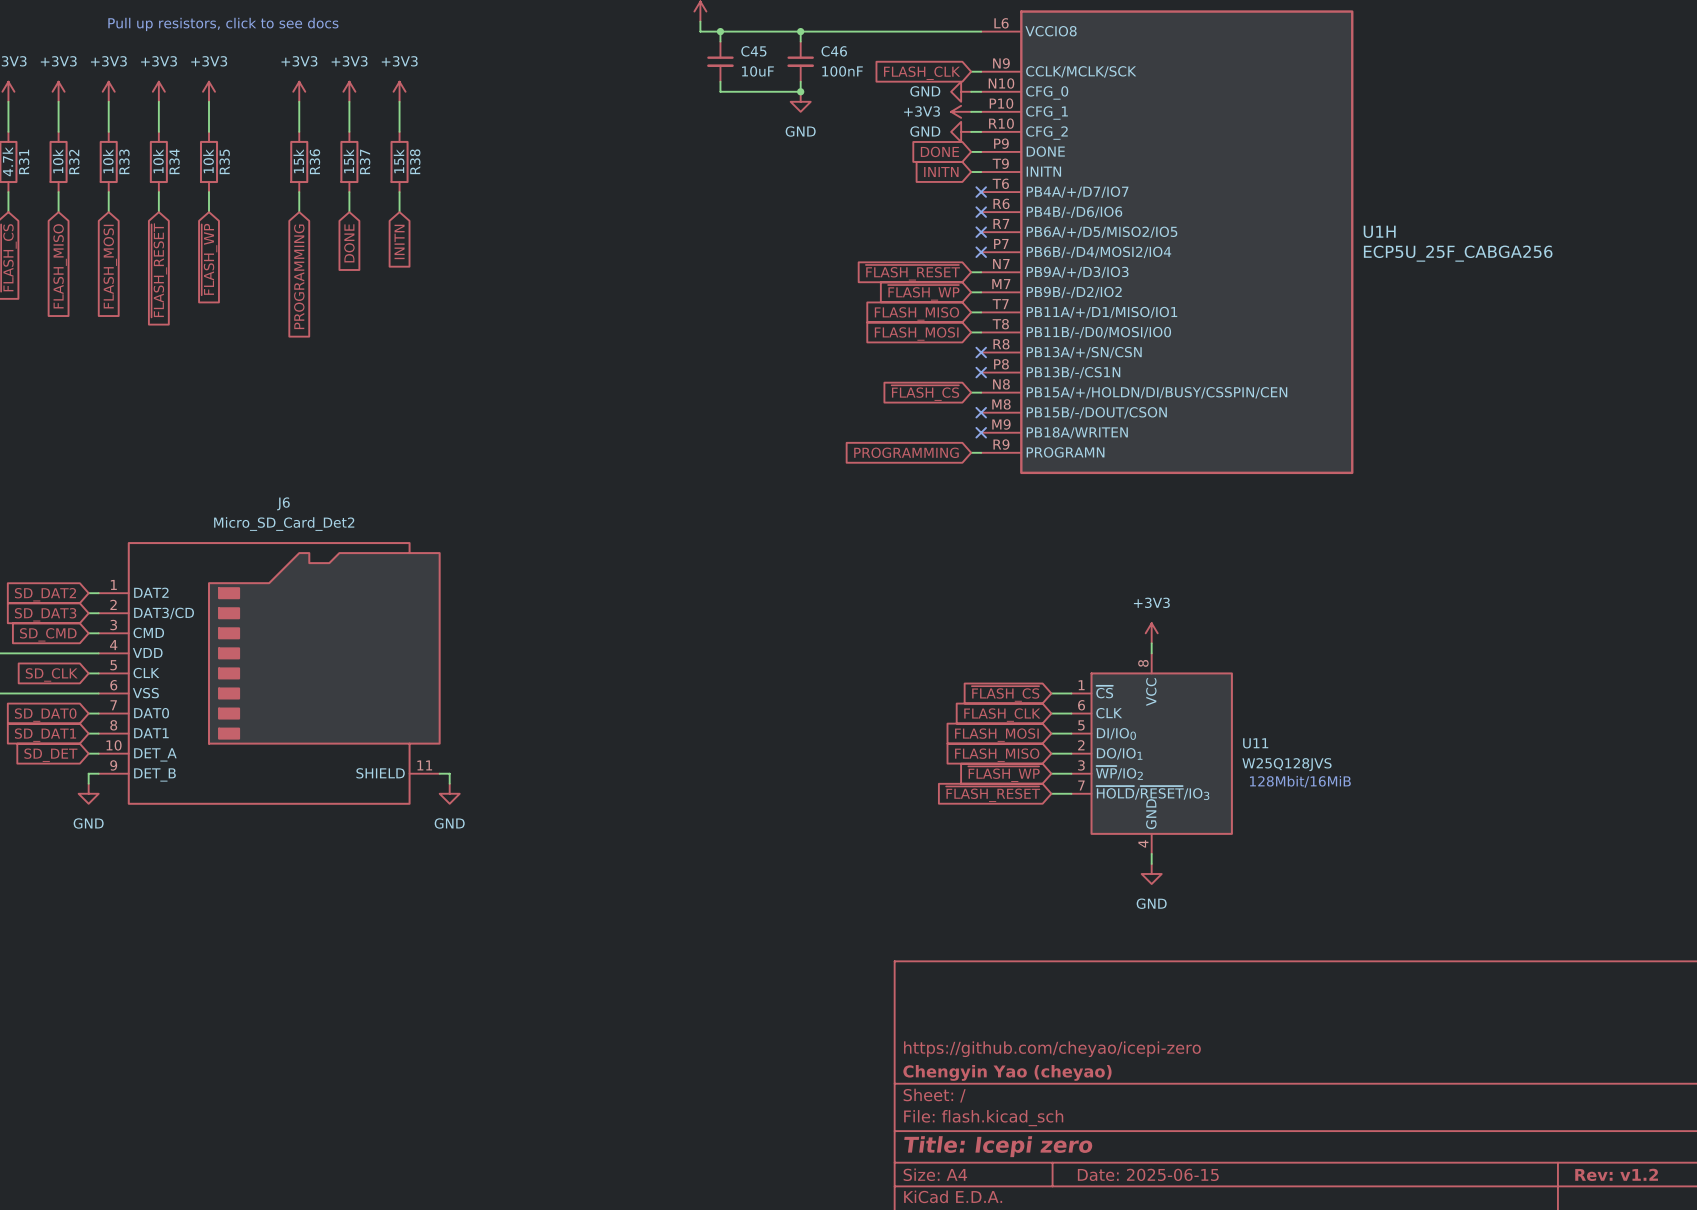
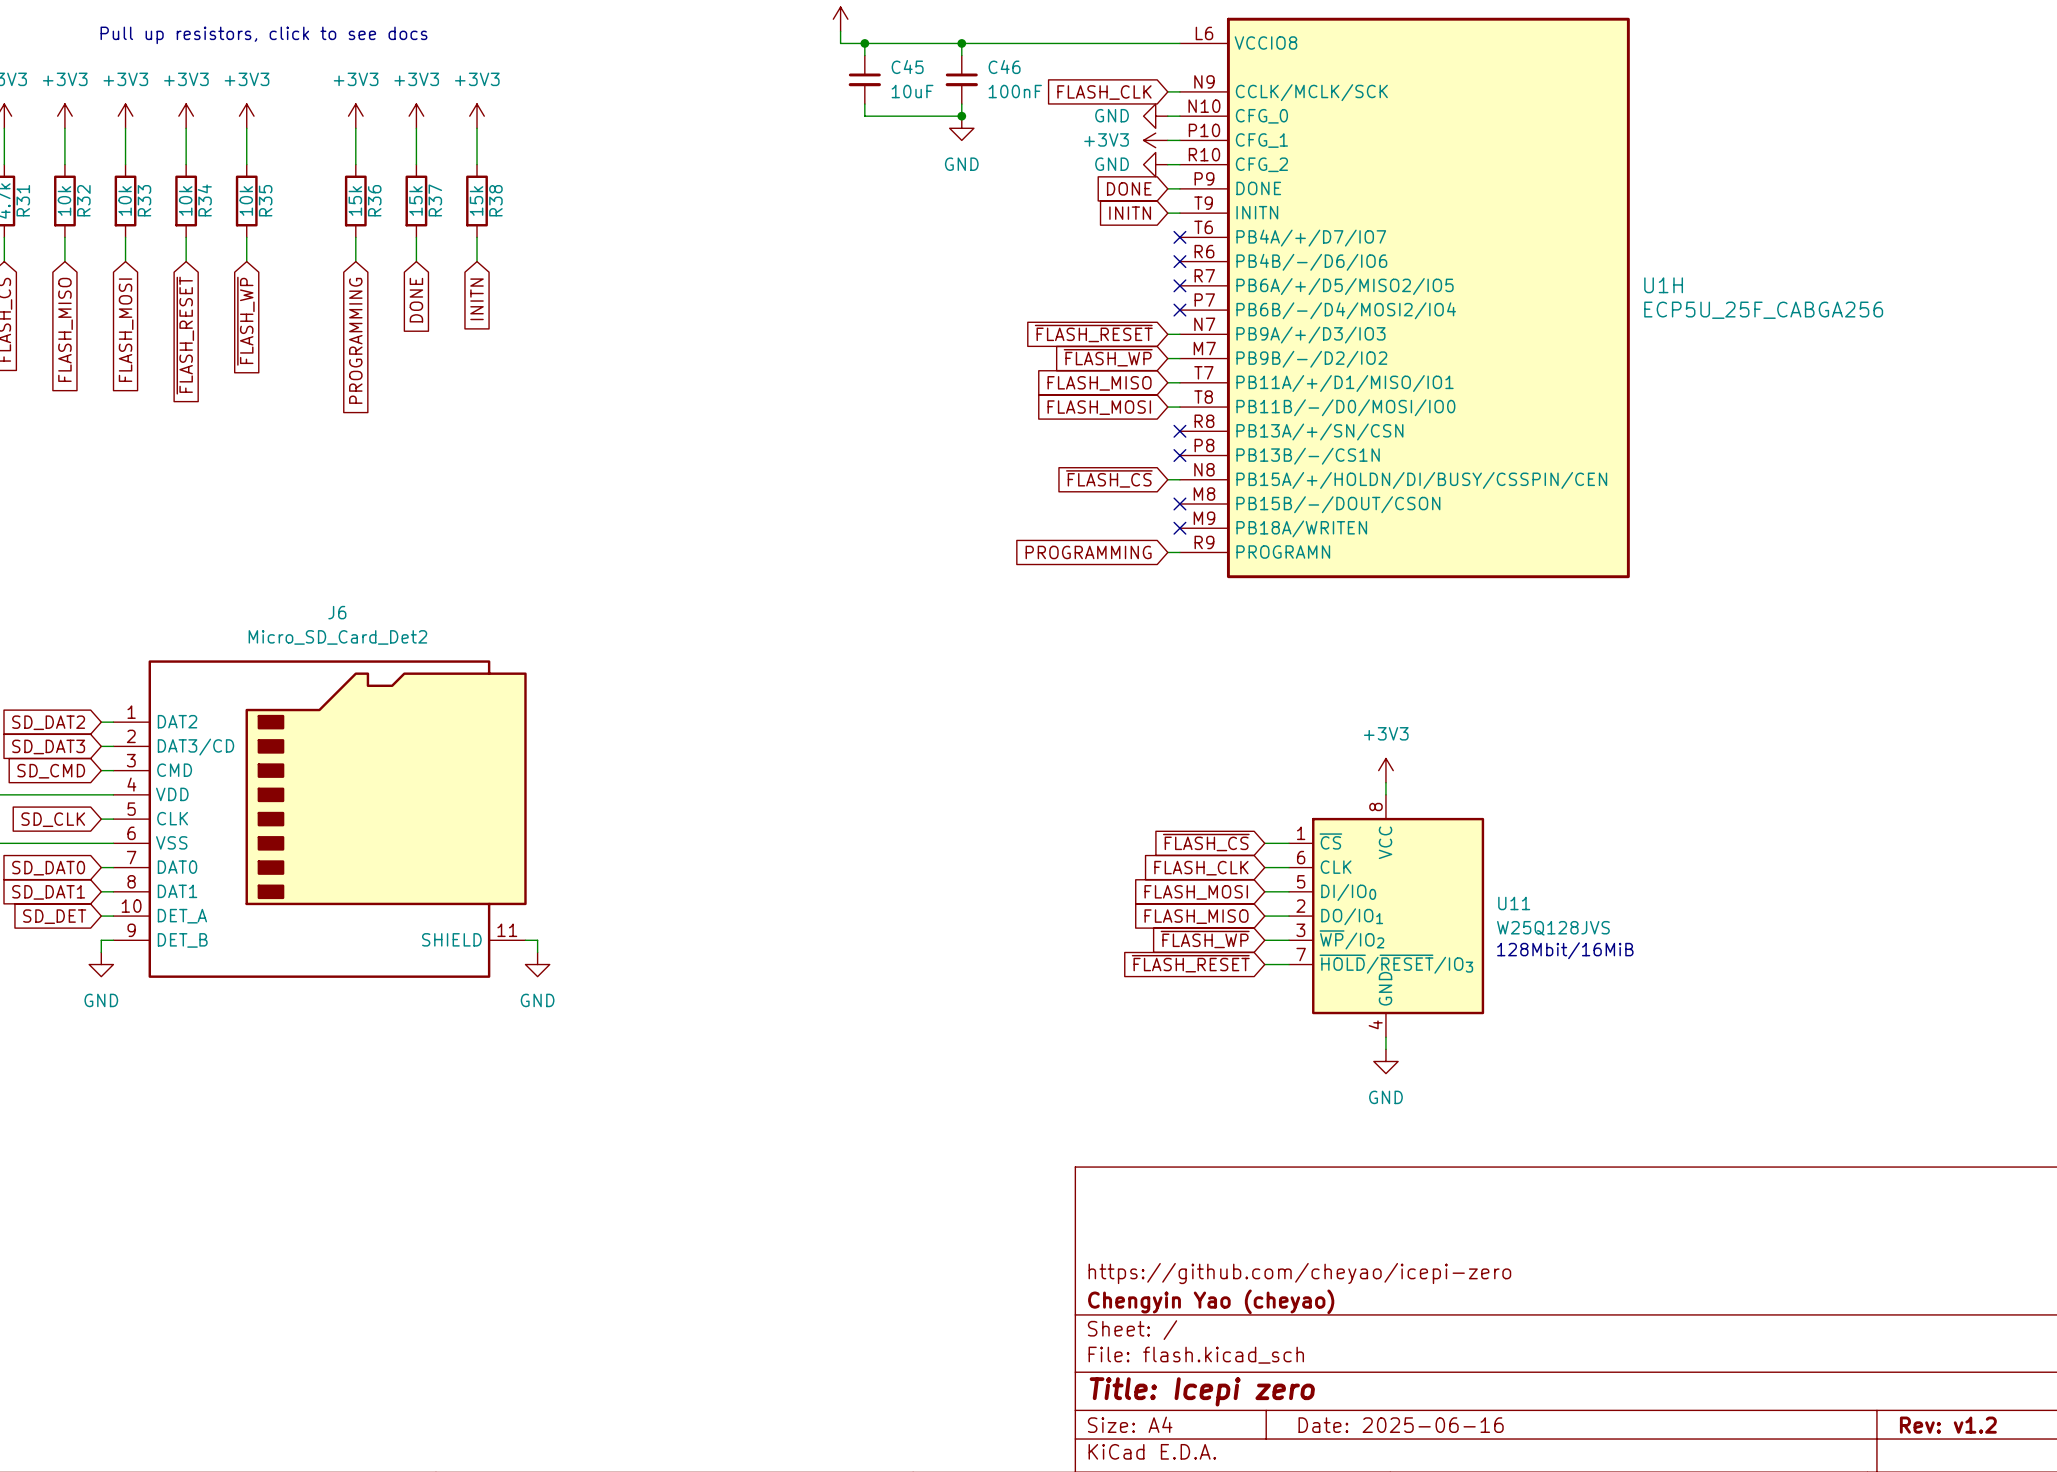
title block: Date: 2025-06-15 (1148, 1174) -> Date: 2025-06-16 (1401, 1425)

